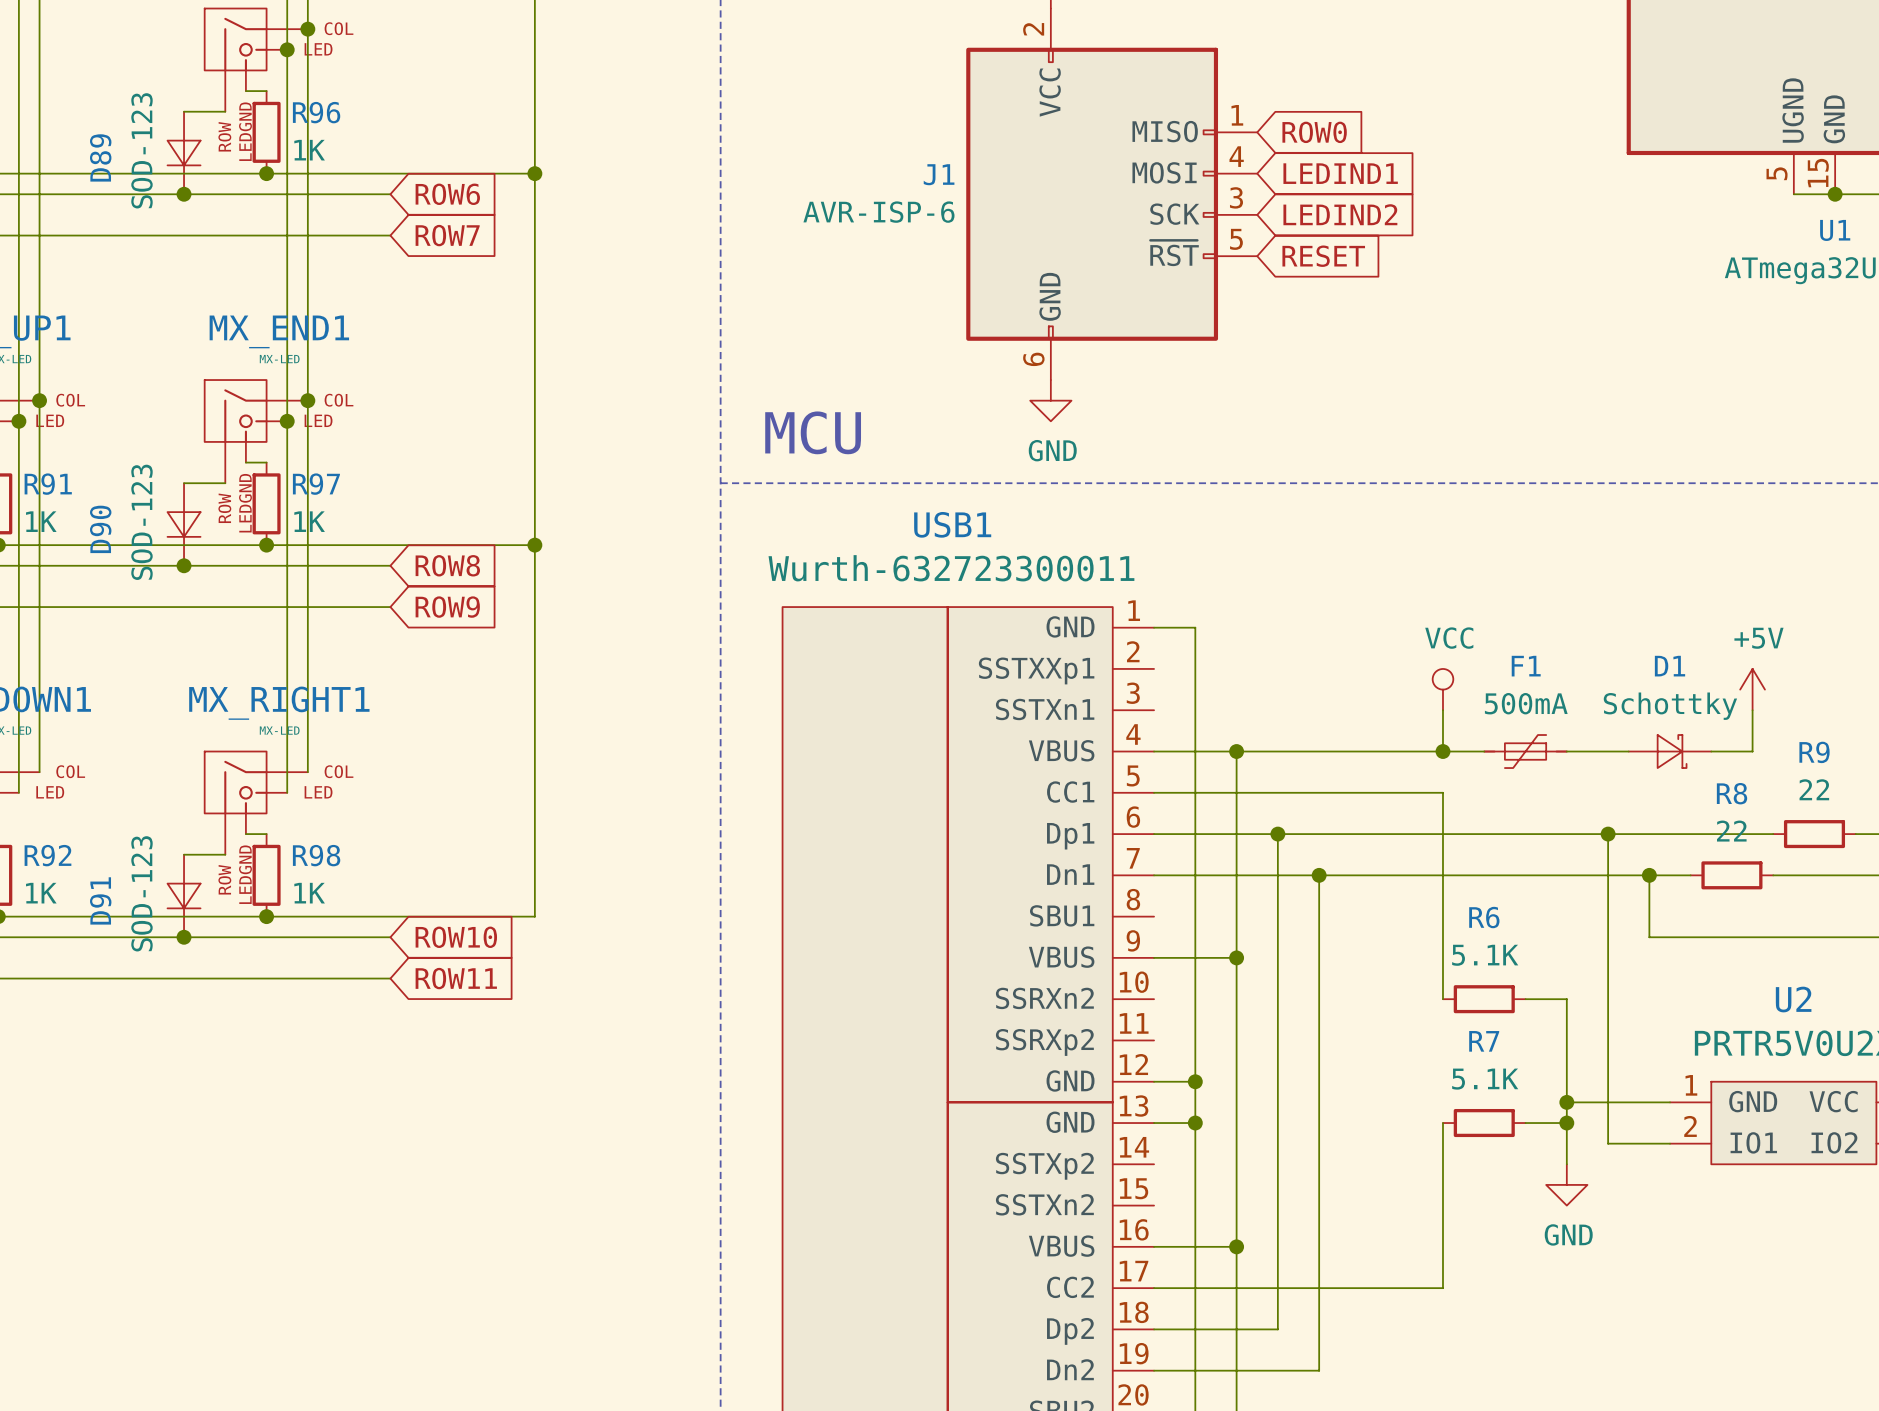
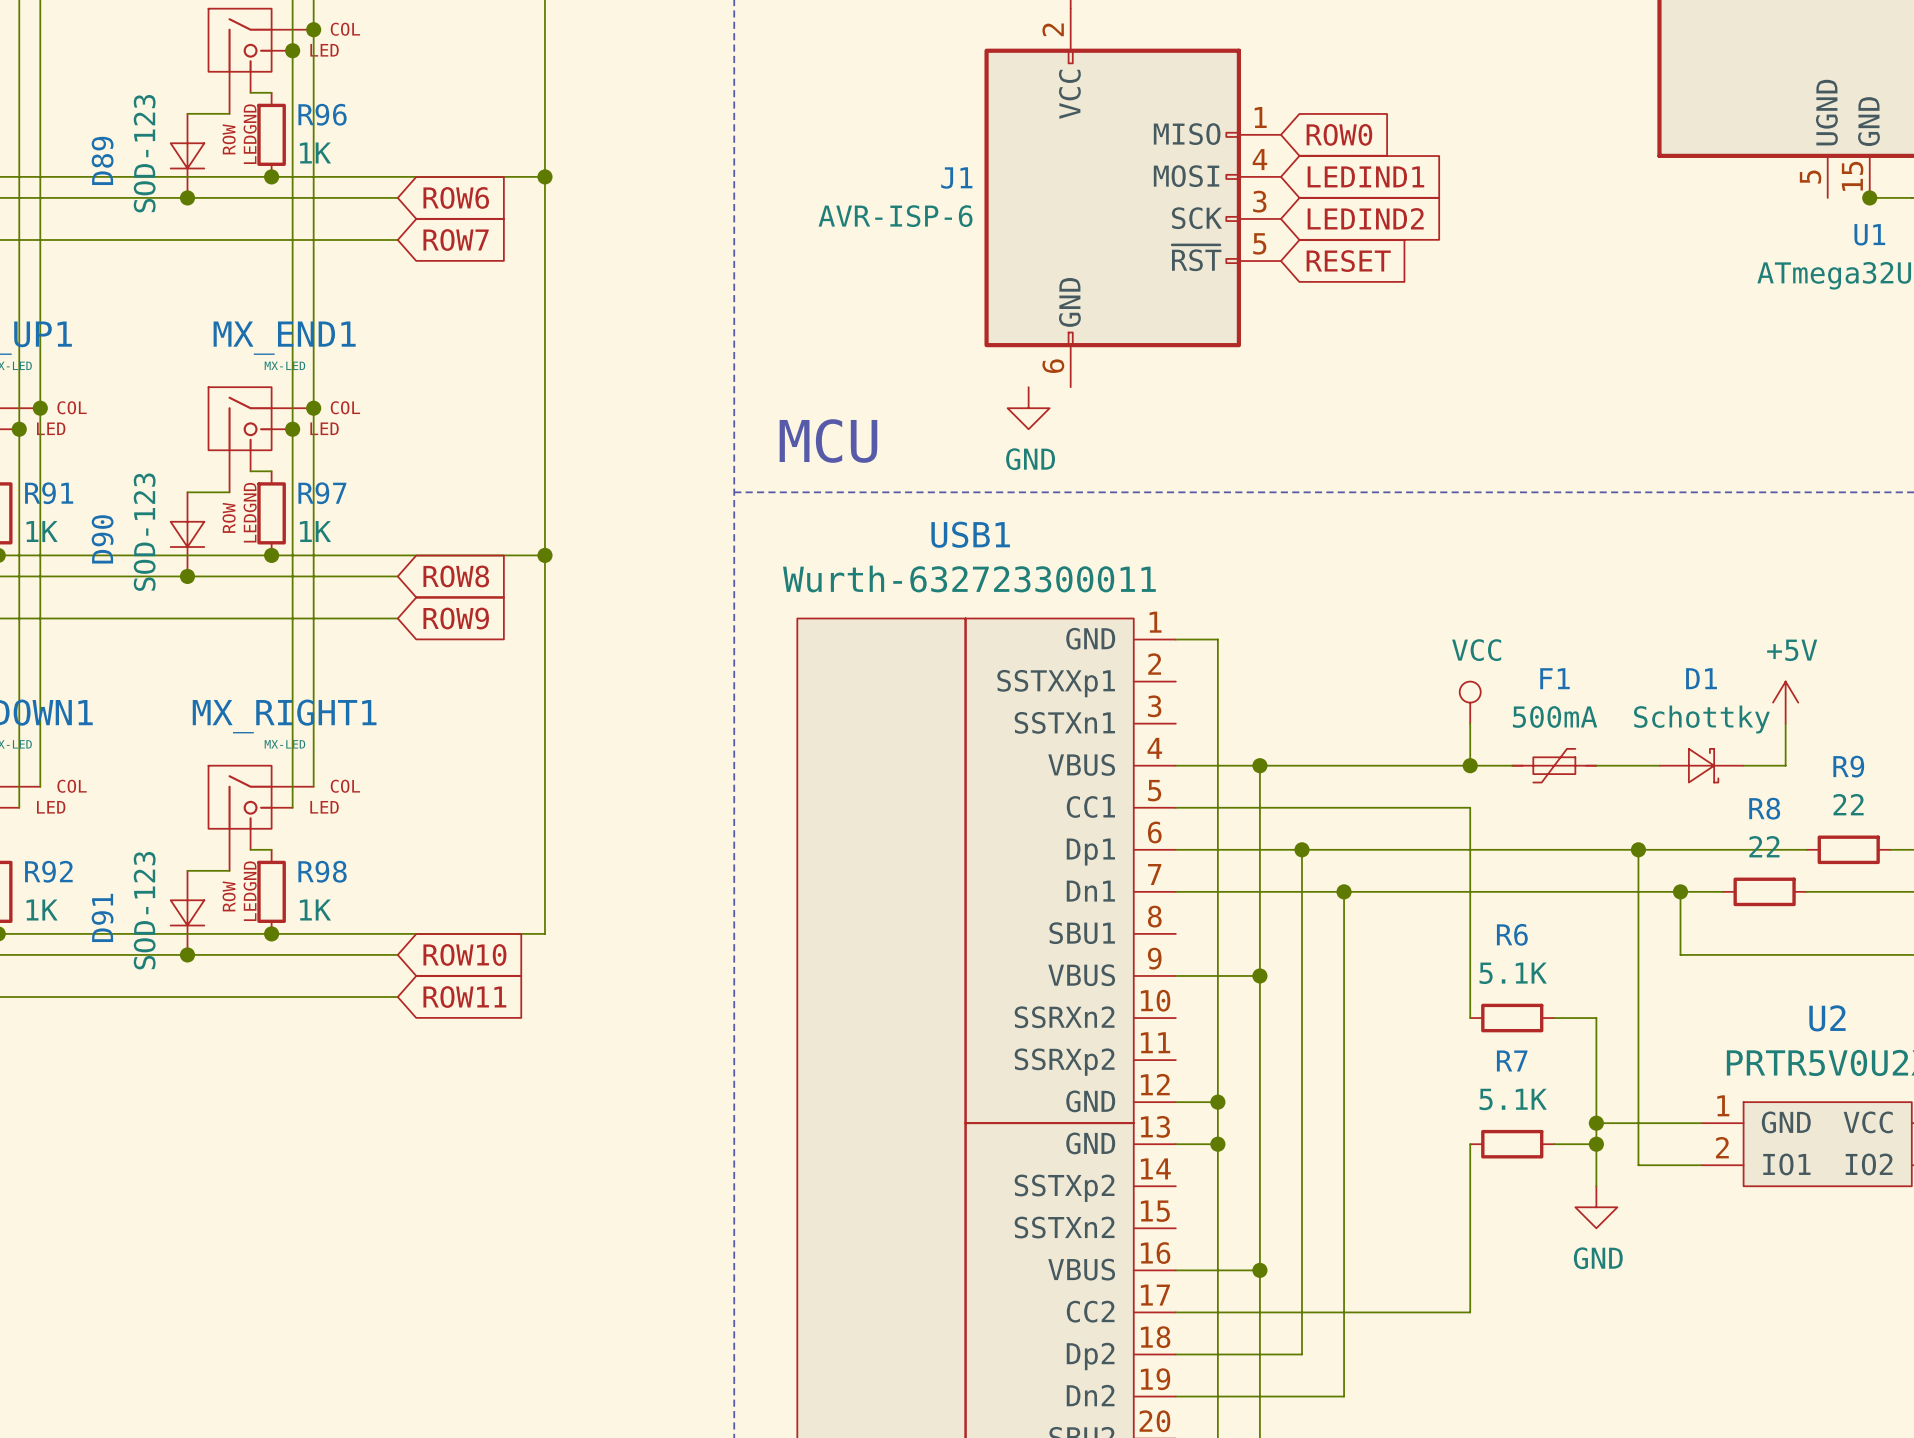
wire: (1793, 194) (1835, 194) -> none
power symbol position: GND (1050, 400) -> GND (1028, 408)

